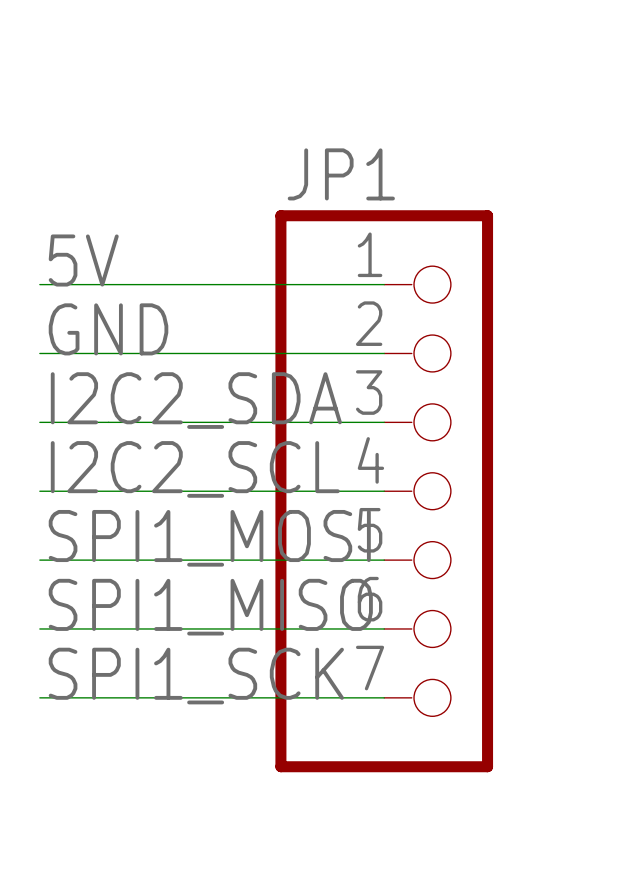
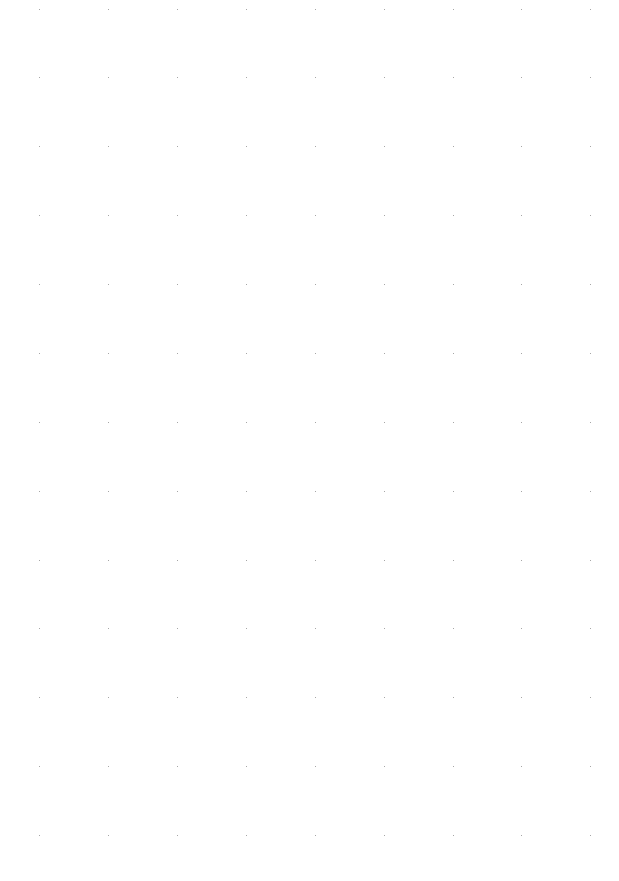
label: 5V (83, 260) -> none
wire: (39, 284) (384, 284) -> none
label: GND (108, 329) -> none
wire: (39, 353) (384, 353) -> none
label: I2C2_SDA (196, 400) -> none
wire: (39, 422) (384, 422) -> none
label: I2C2_SCL (195, 469) -> none
wire: (39, 491) (384, 491) -> none
JP1: (384, 491) -> none
label: SPI1_MOSI (209, 538) -> none
wire: (39, 560) (384, 560) -> none
label: SPI1_MISO (210, 607) -> none
wire: (39, 628) (384, 628) -> none
label: SPI1_SCK (196, 676) -> none
wire: (39, 697) (384, 697) -> none

